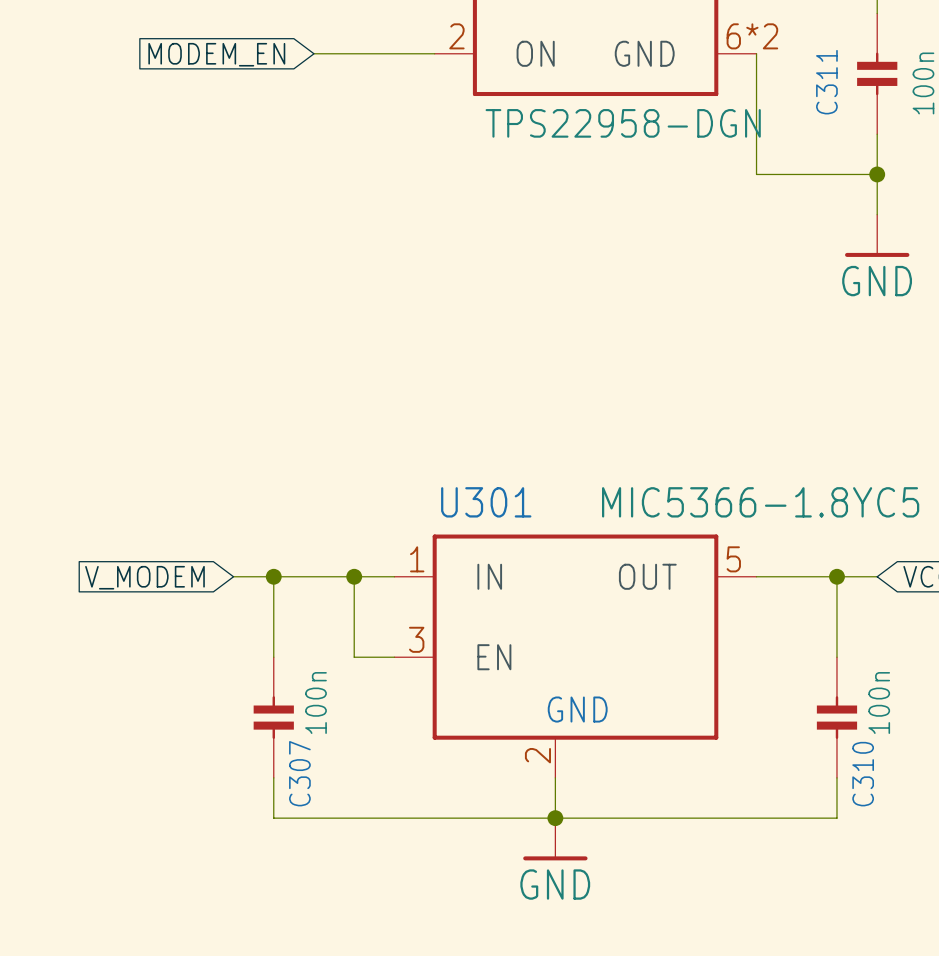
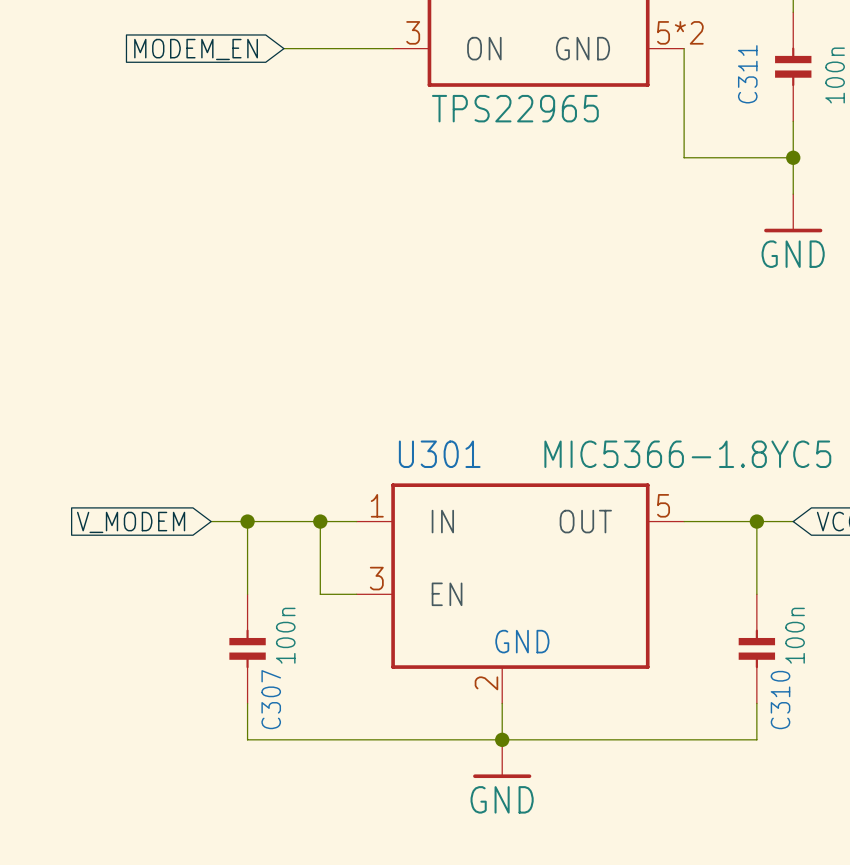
part pin number: 2 (456, 36) -> 3 (413, 32)
part pin number: 6*2 (752, 36) -> 5*2 (680, 32)
part value: TPS22958-DGN (623, 123) -> TPS22965 (515, 108)

